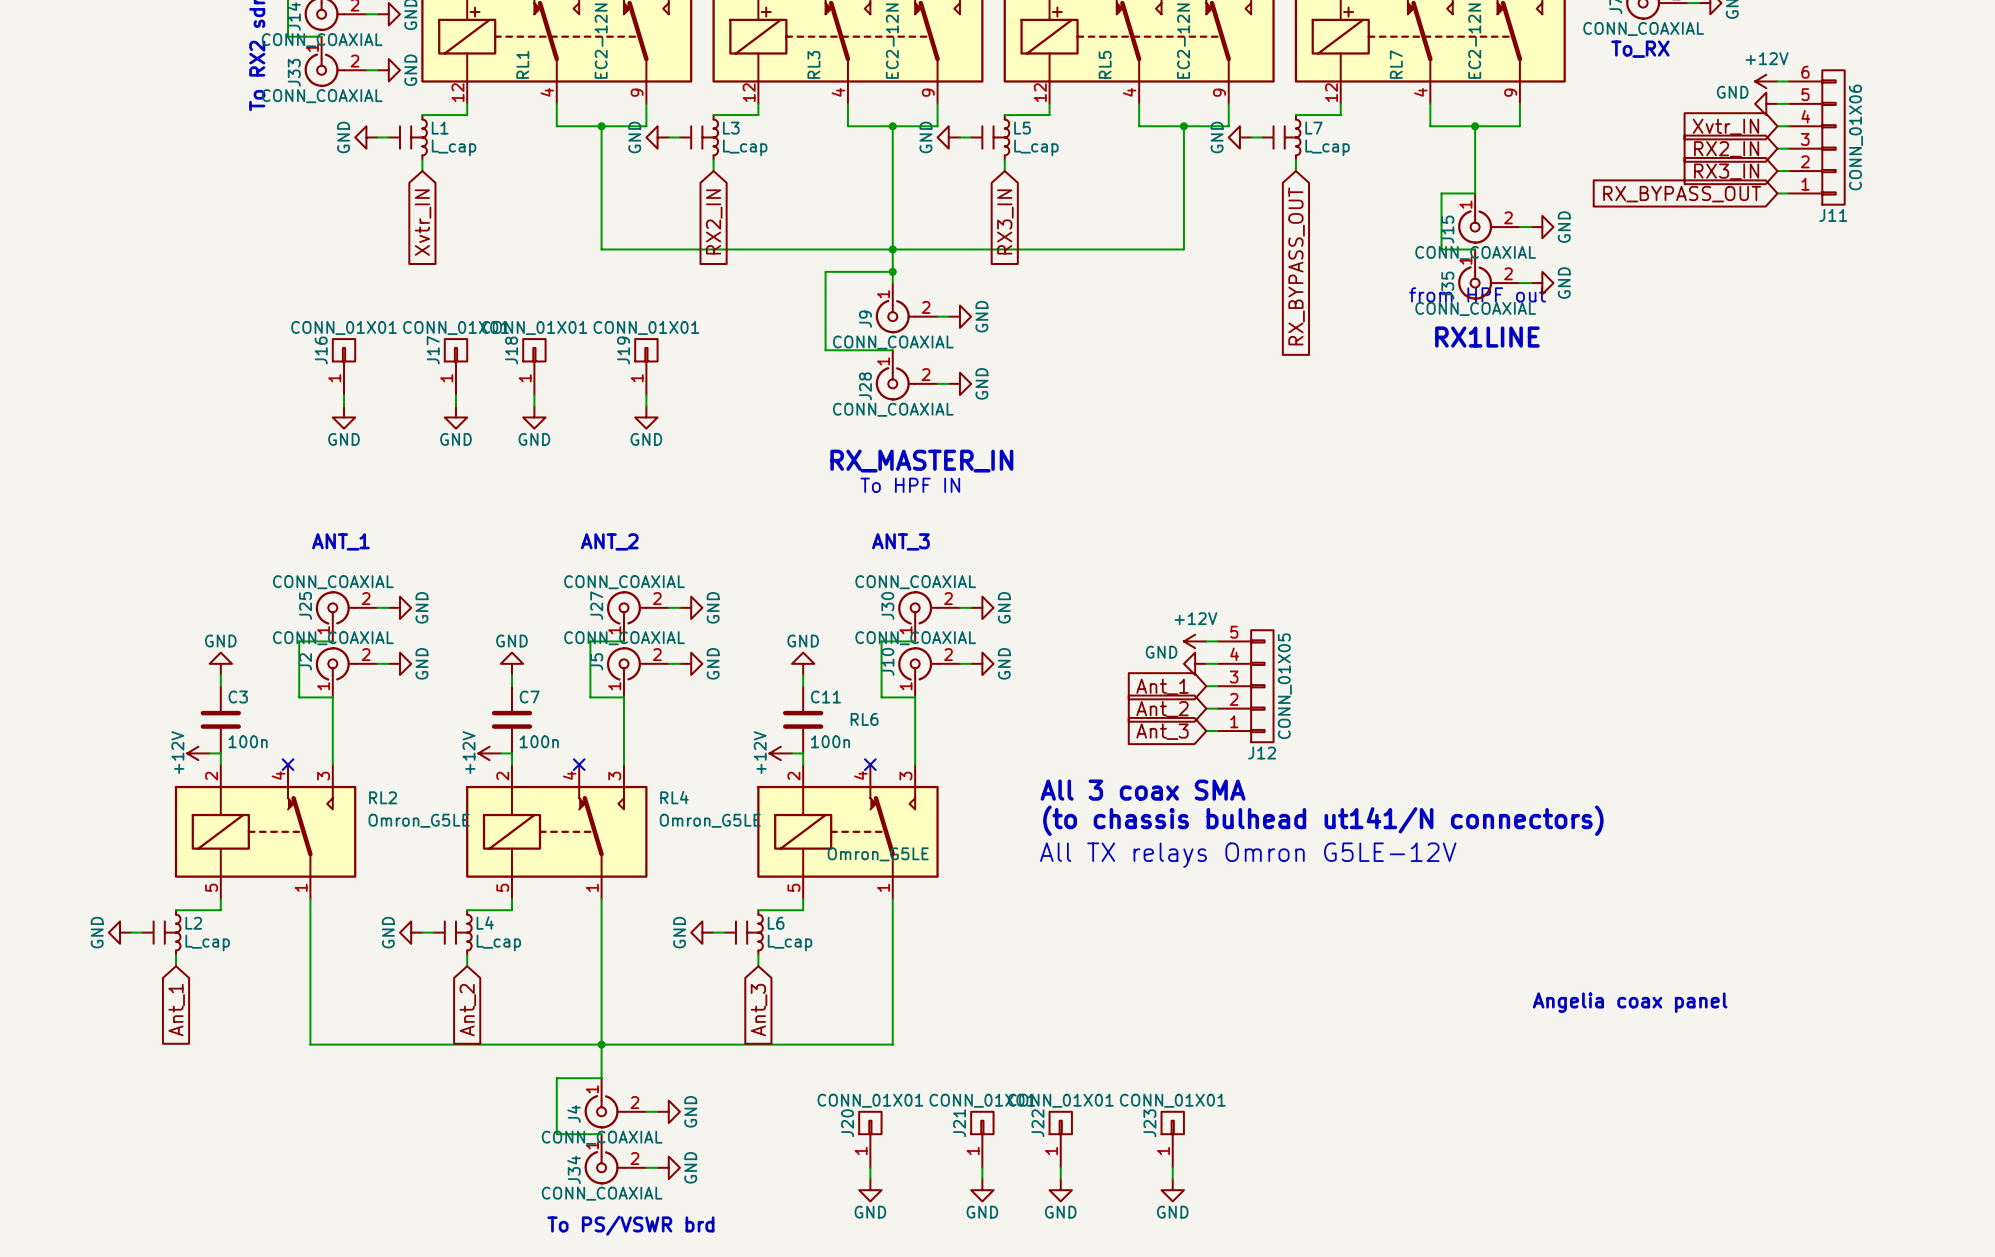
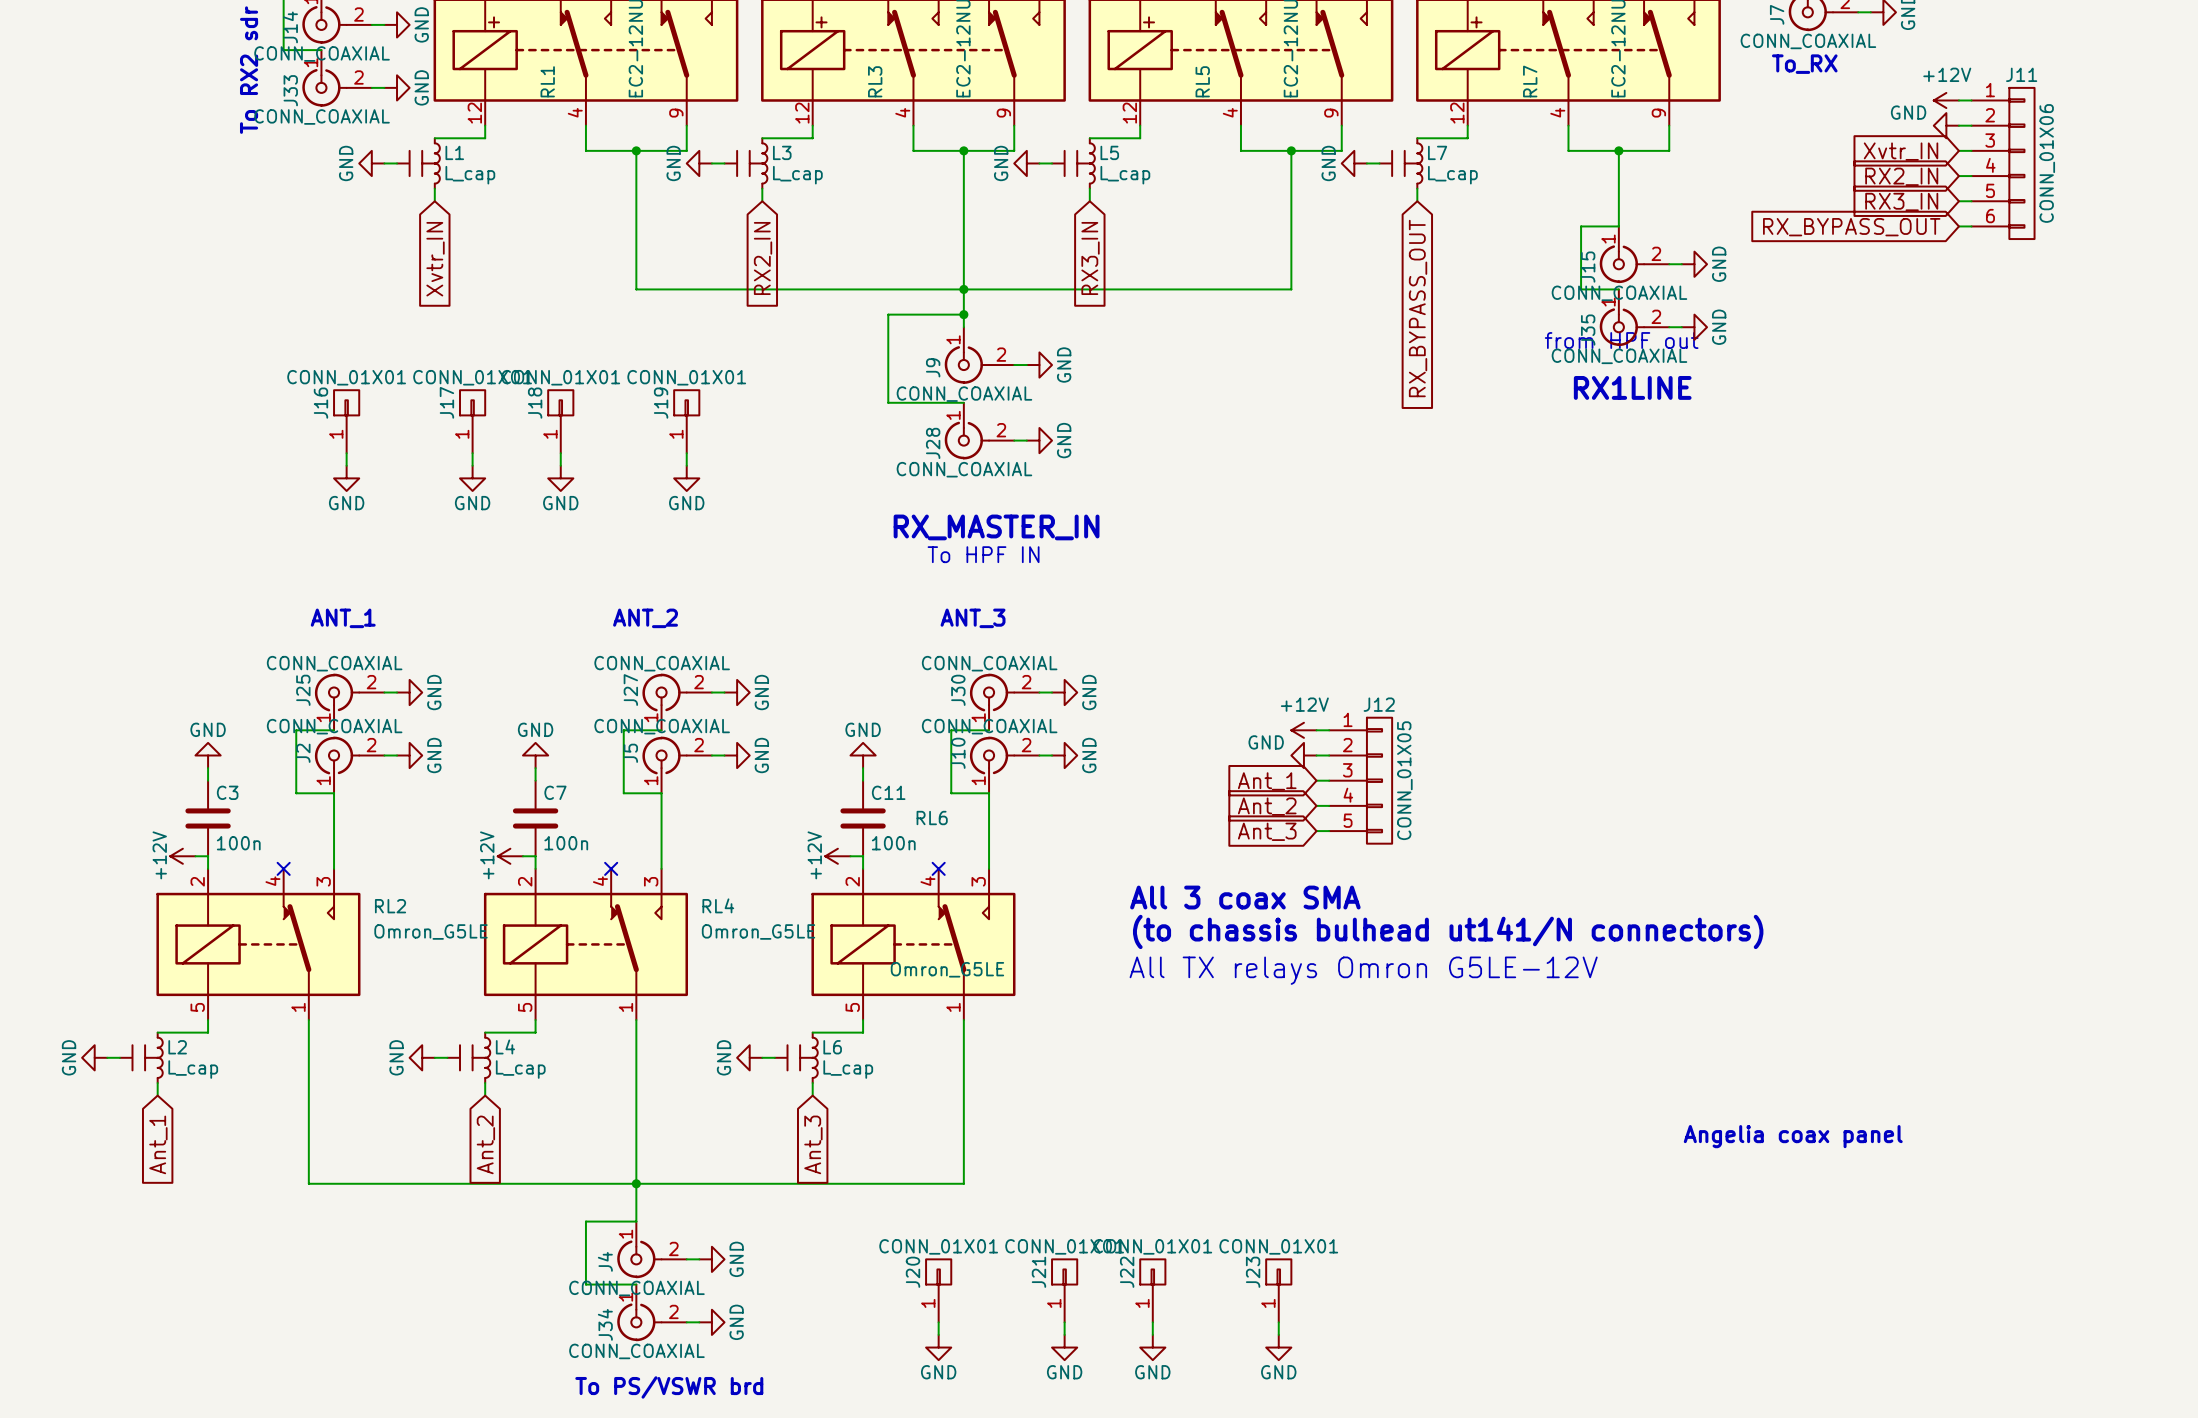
J11 flip: as is (1833, 137) -> up-down (2021, 163)
J12 flip: as is (1262, 686) -> up-down (1379, 780)

